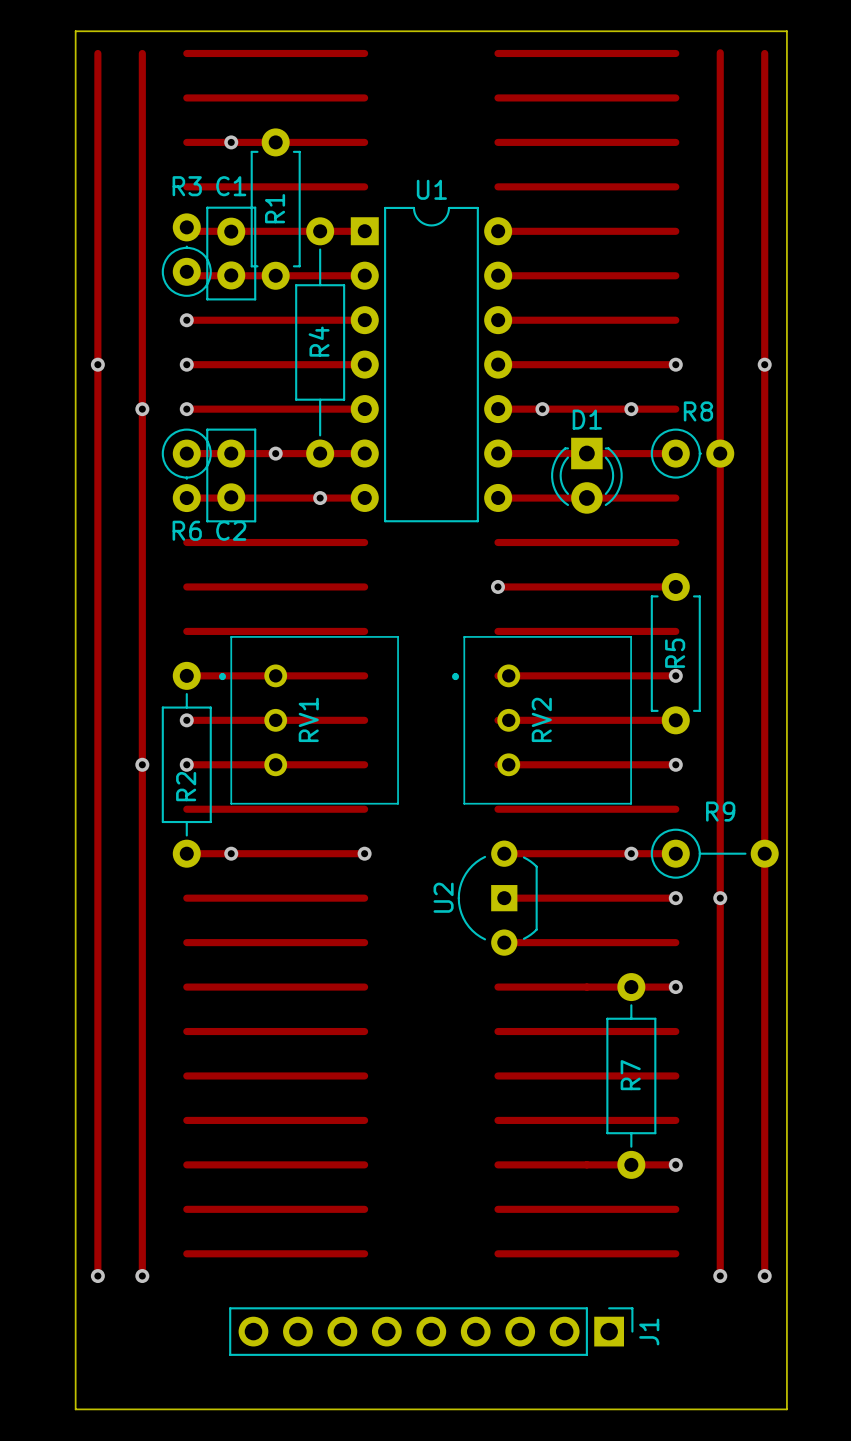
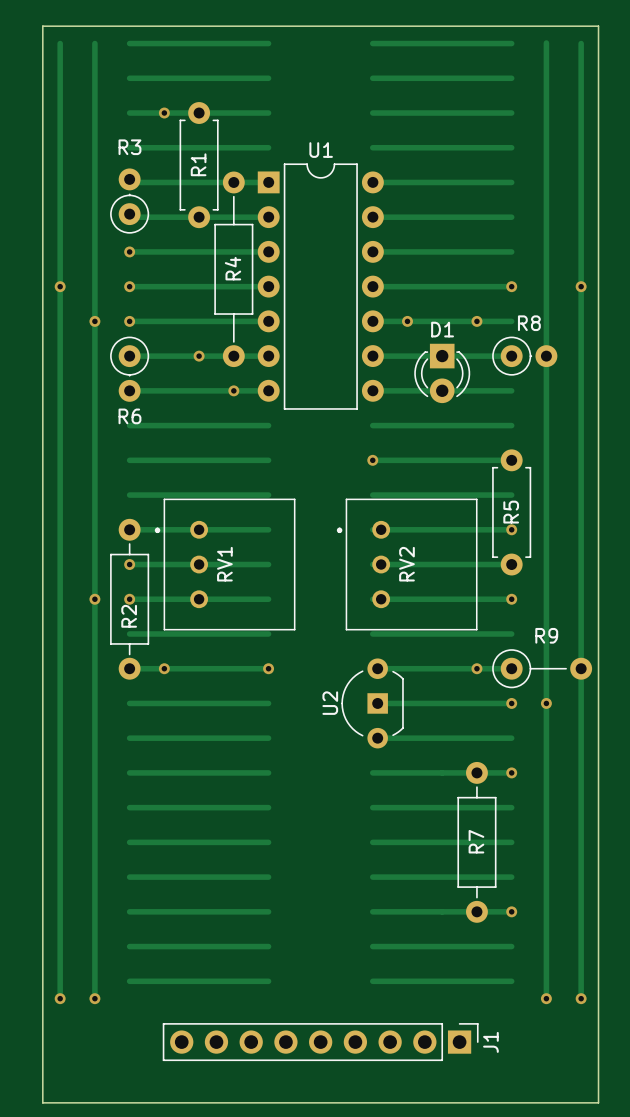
C1: (231, 253) -> none
C2: (231, 475) -> none

